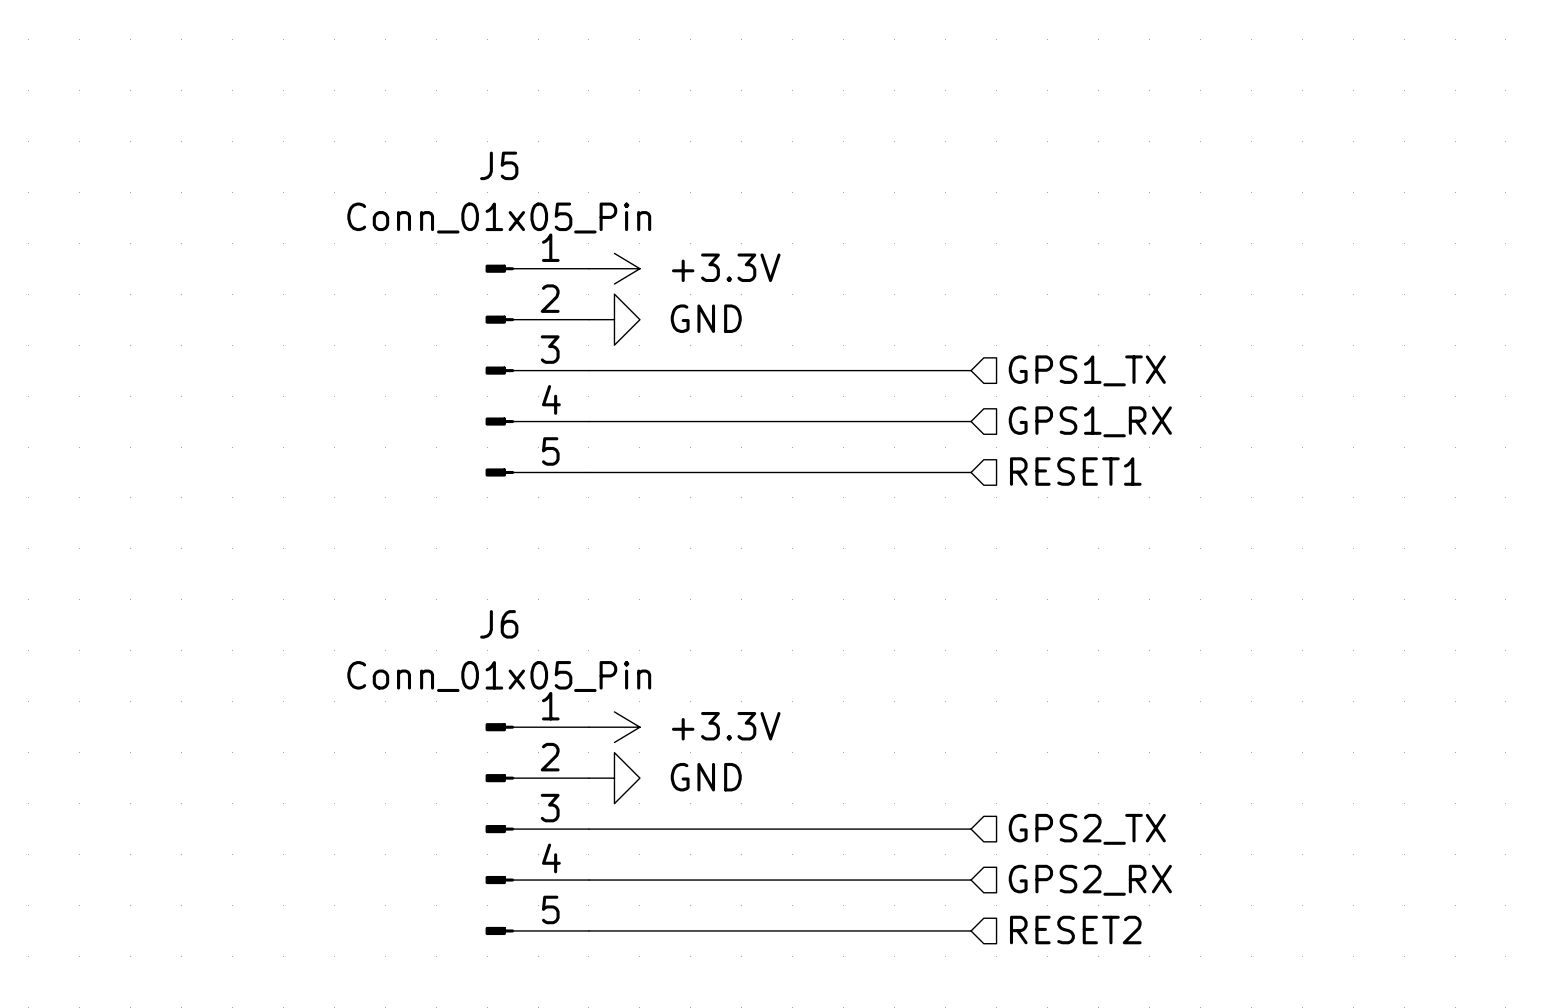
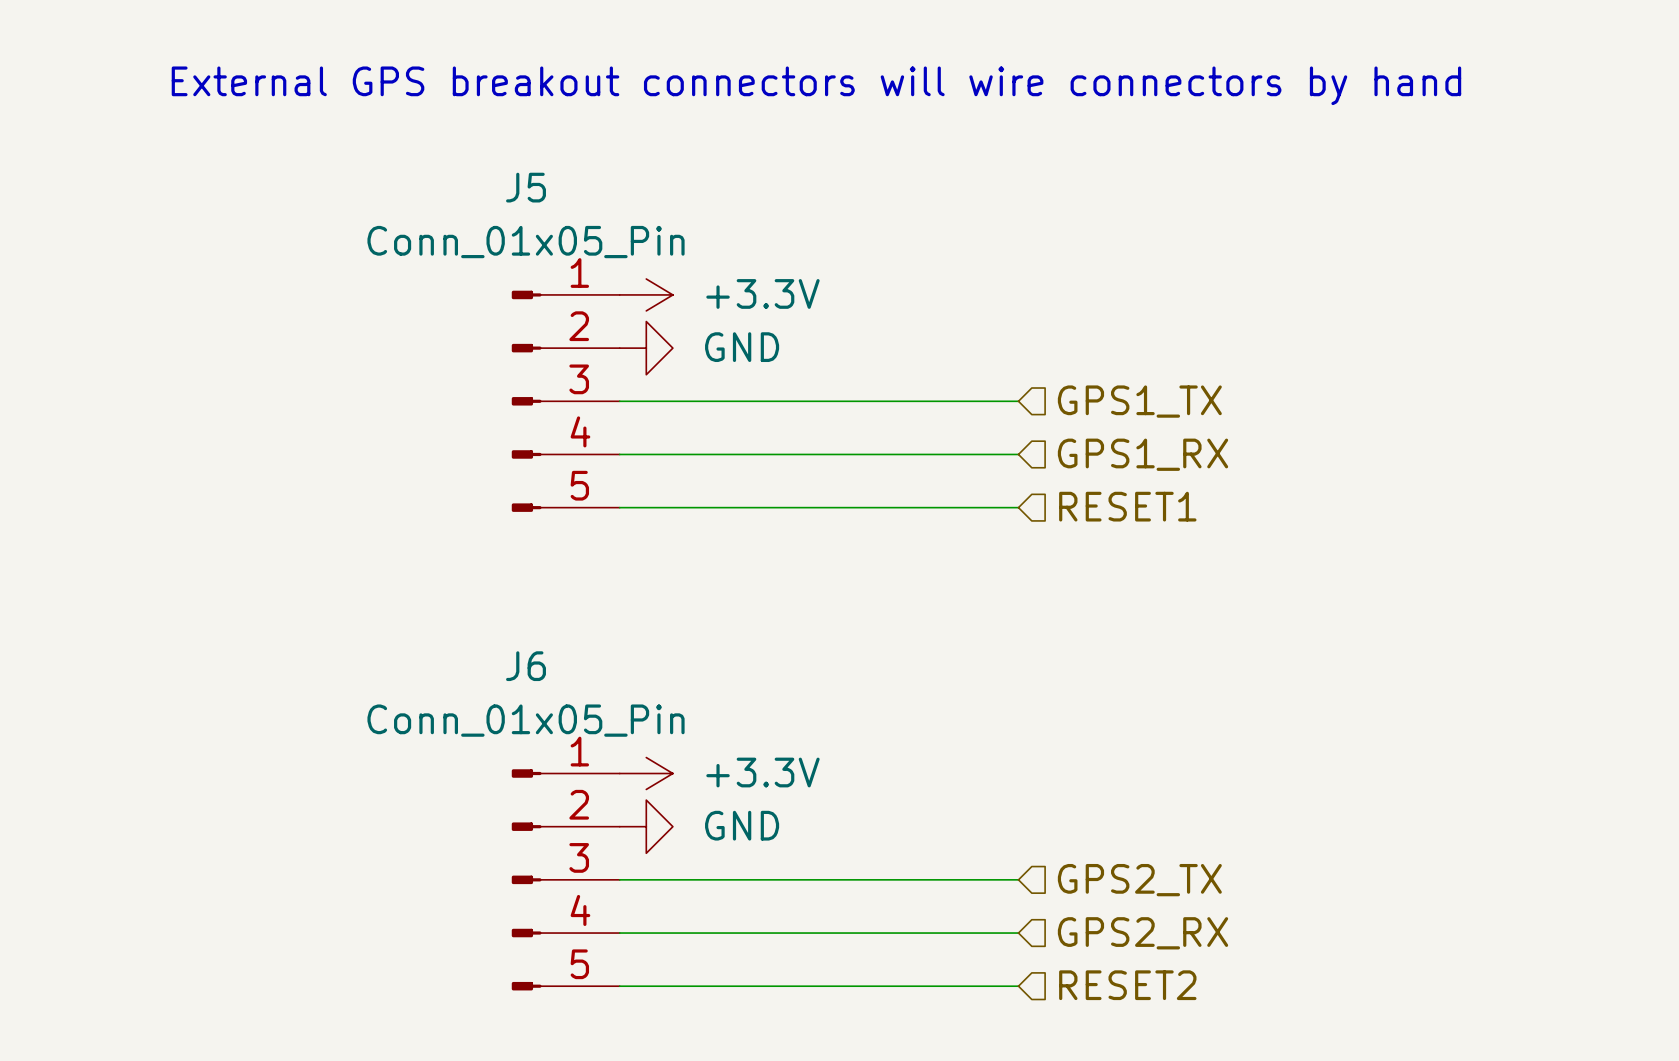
text: none -> External GPS breakout connectors will wire connectors by hand (816, 85)

